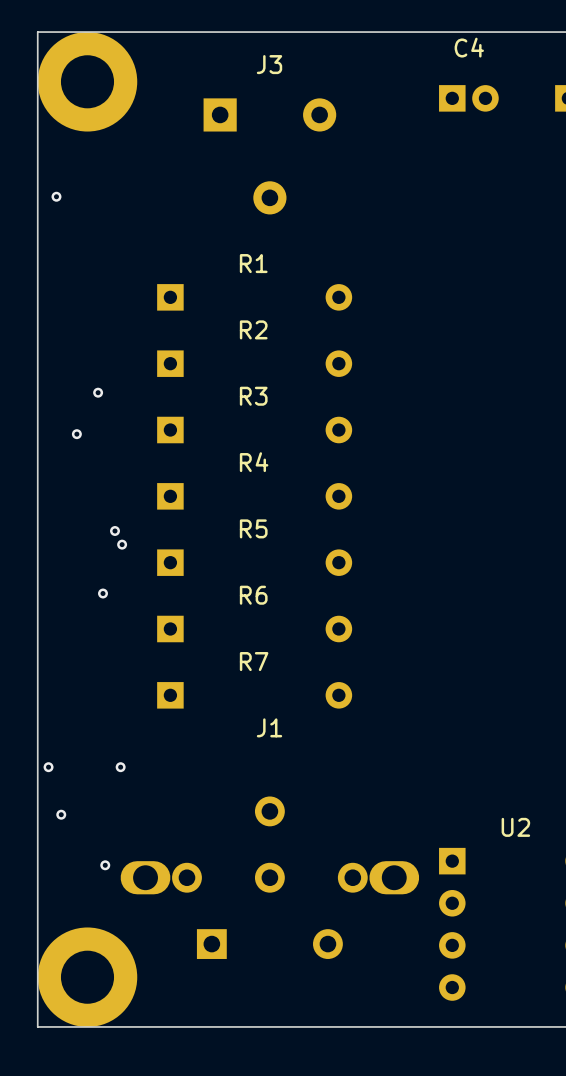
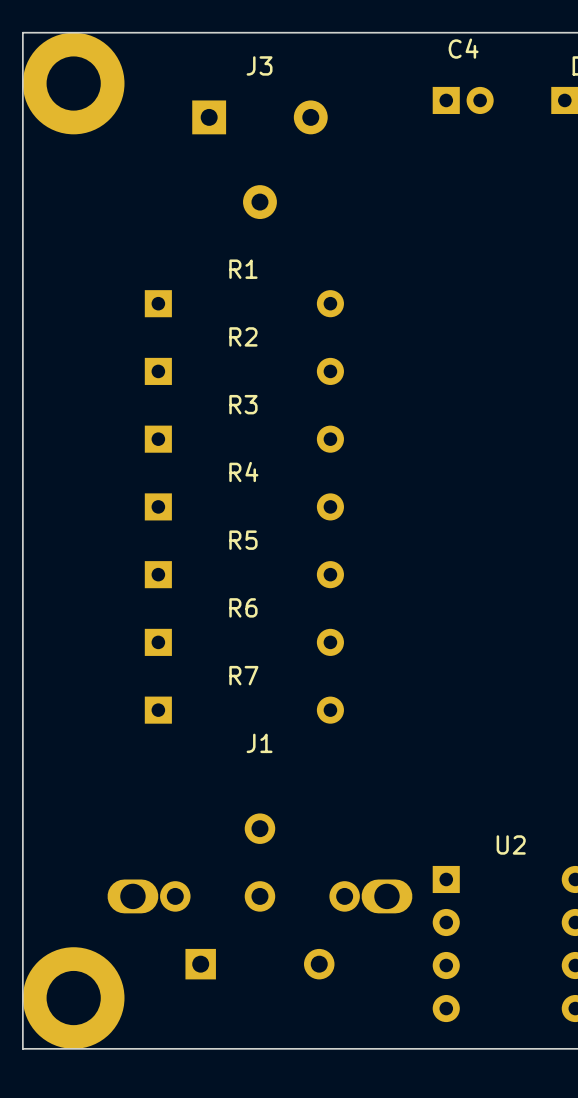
via: (56, 196) -> none
via: (98, 392) -> none
via: (76, 434) -> none
via: (115, 530) -> none
via: (122, 544) -> none
via: (103, 593) -> none
via: (48, 767) -> none
via: (120, 767) -> none
via: (61, 814) -> none
via: (105, 865) -> none

